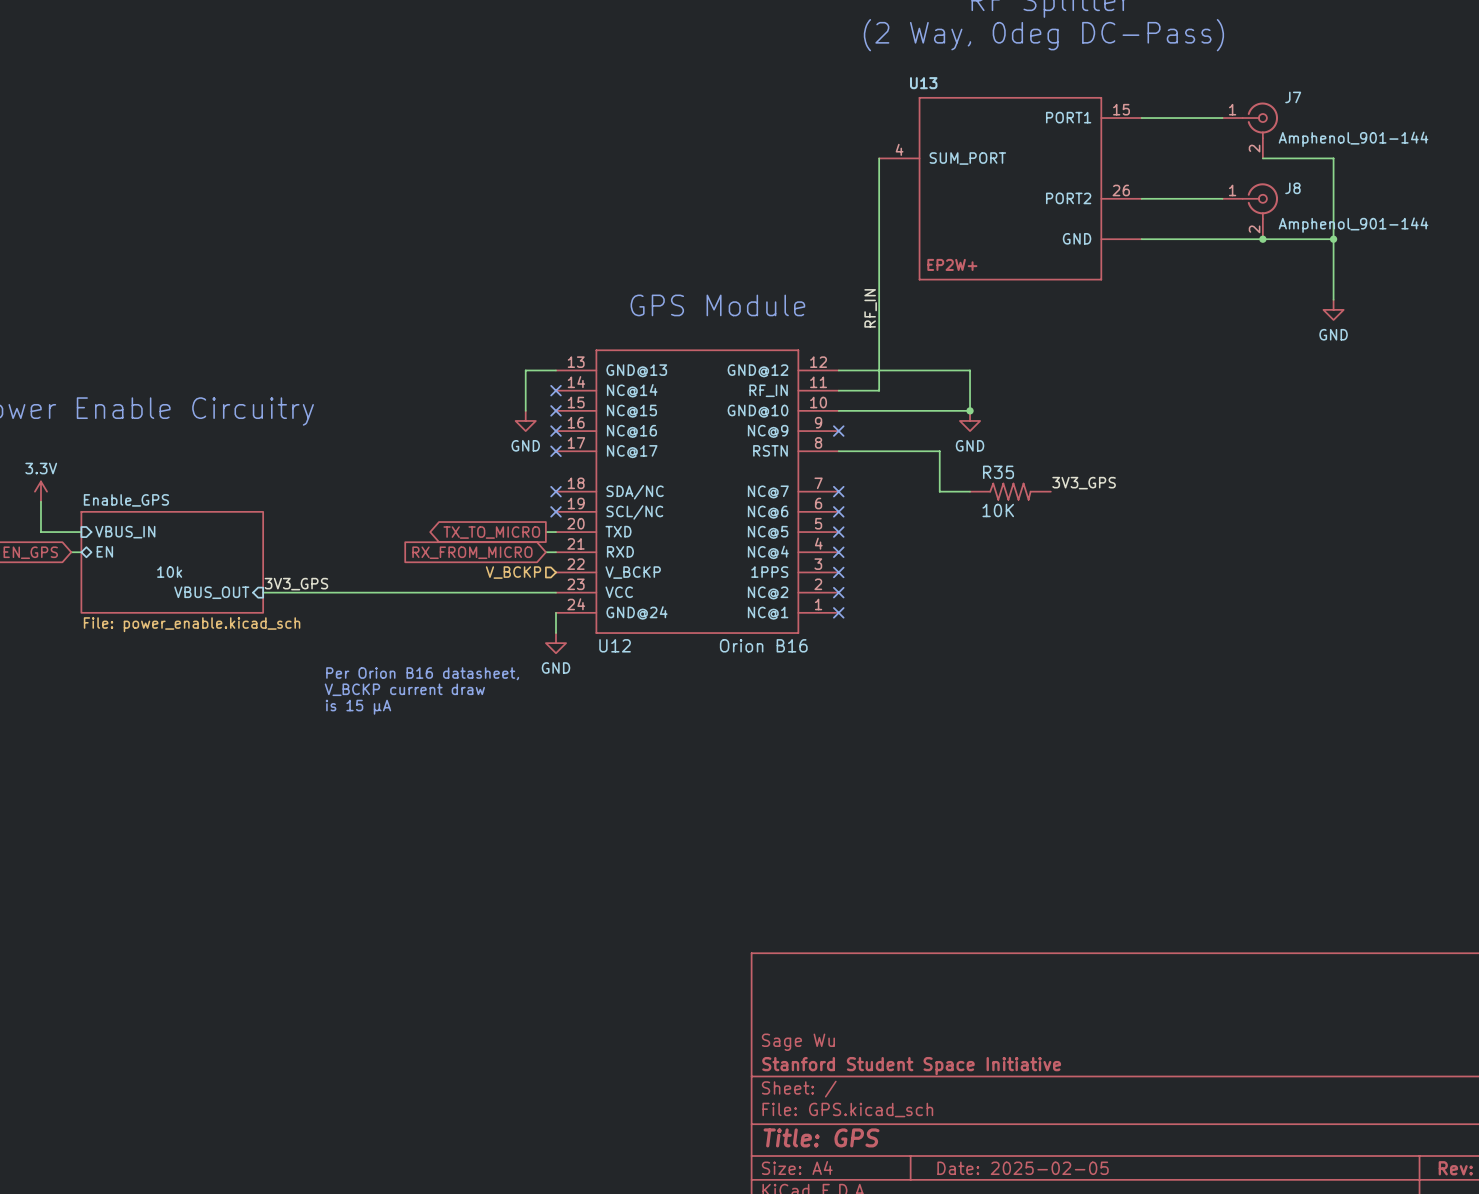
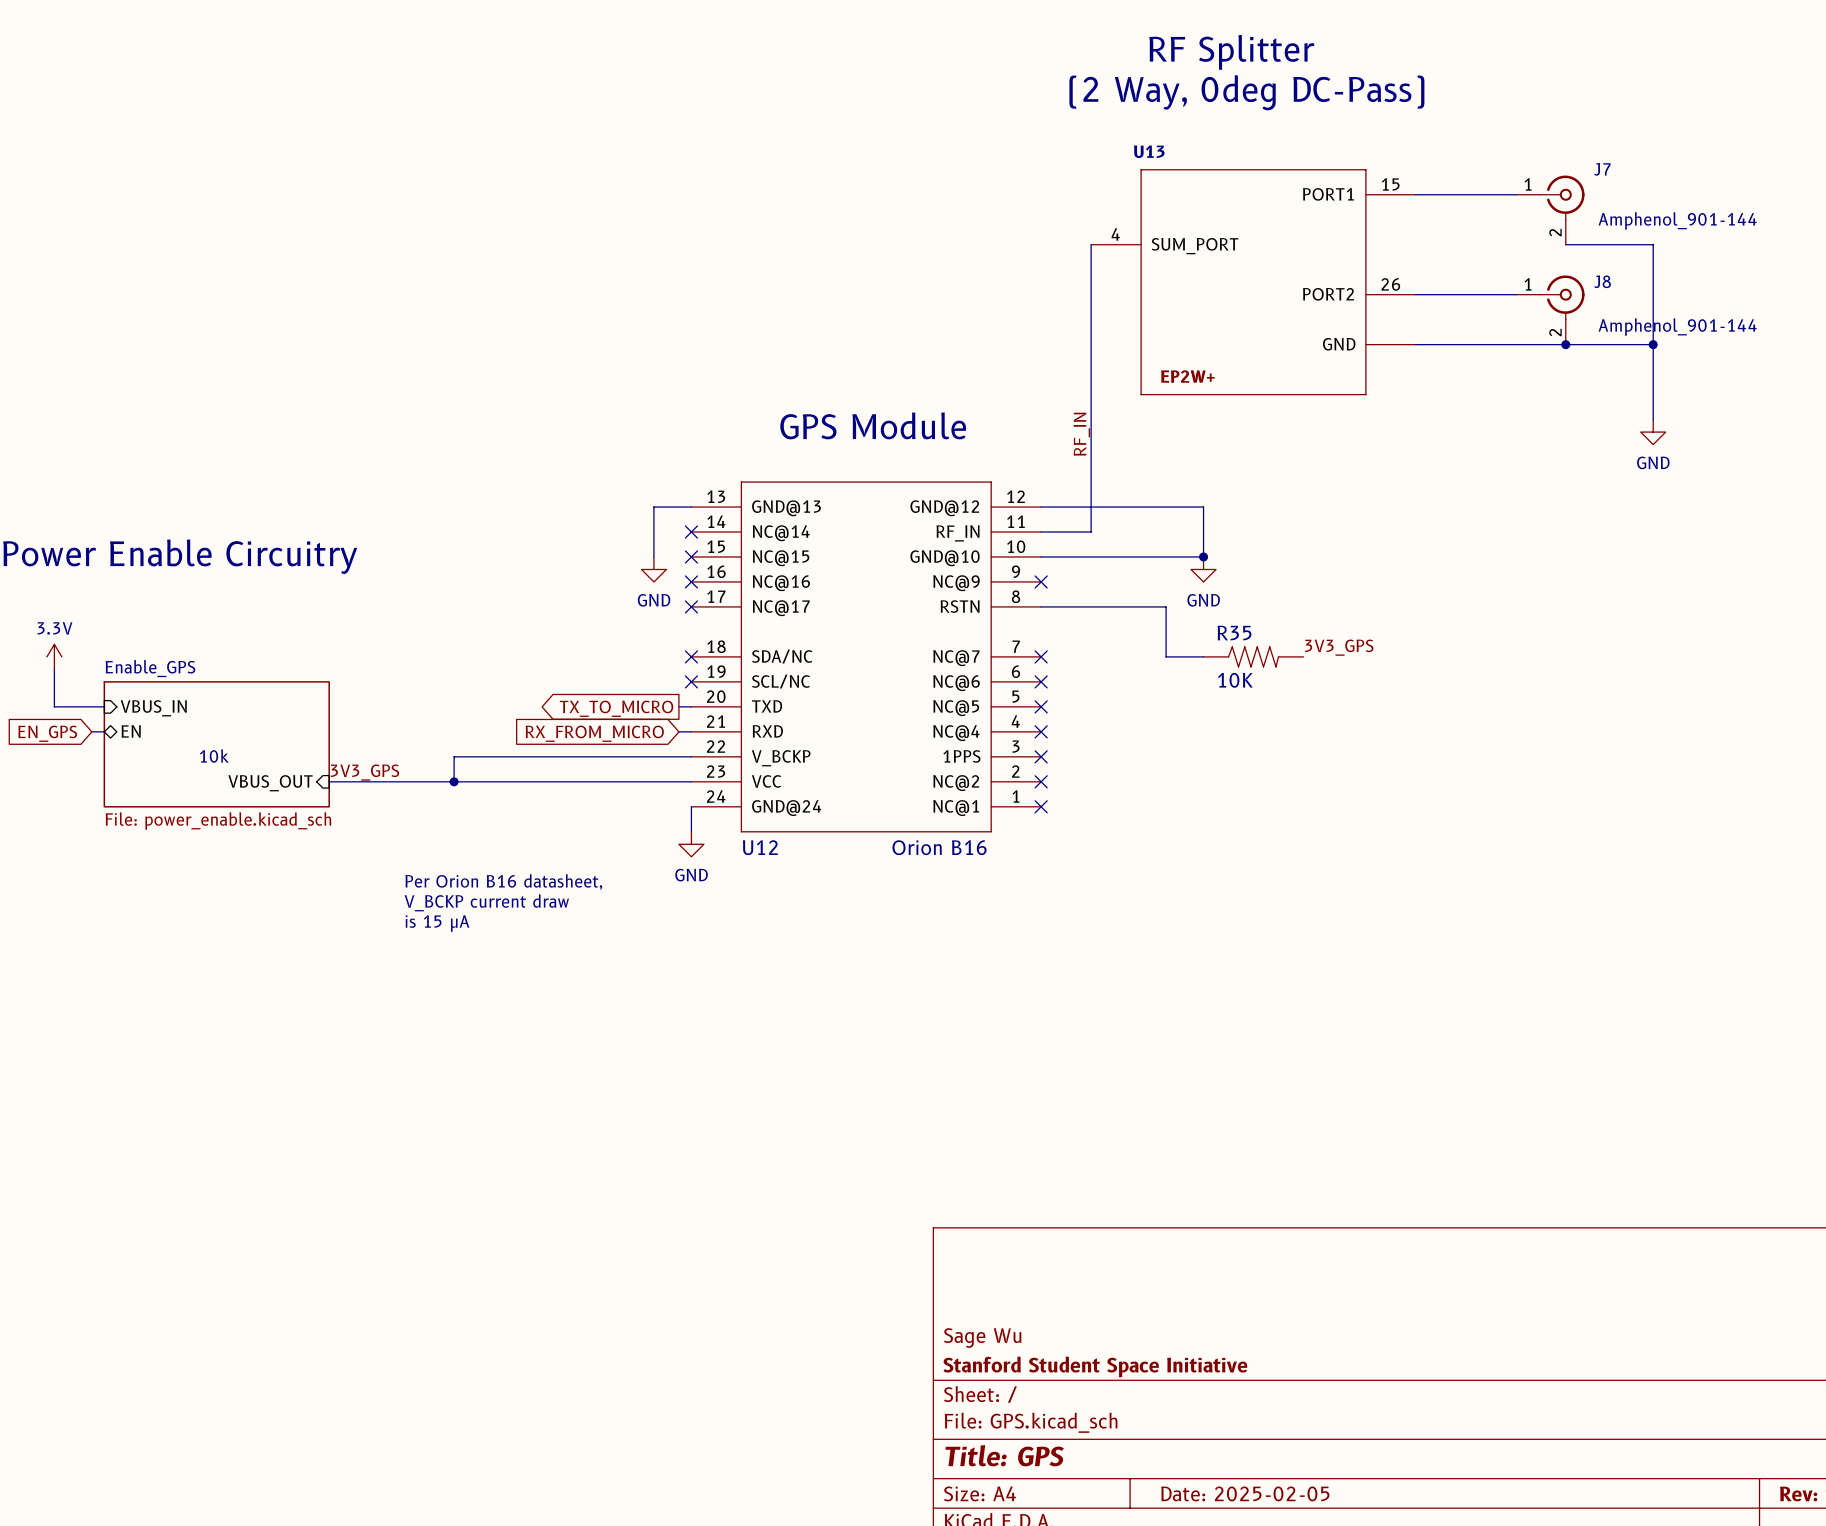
hierarchical label: V_BCKP (513, 572) -> none
wire: none -> (691, 756) (454, 756) (454, 781)
junction: none -> (454, 781)

